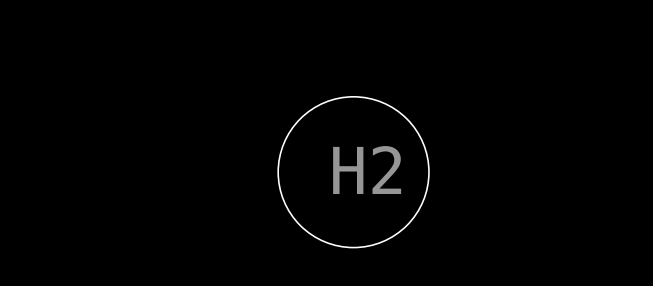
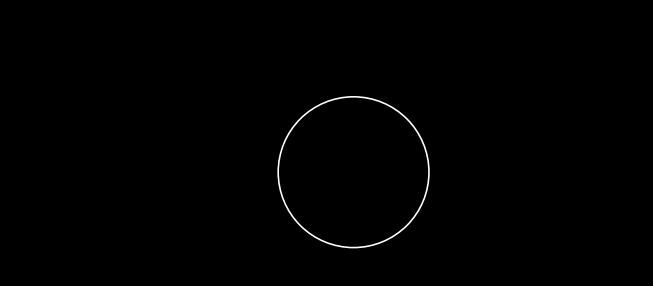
H2 name: H2 (367, 170) -> none

